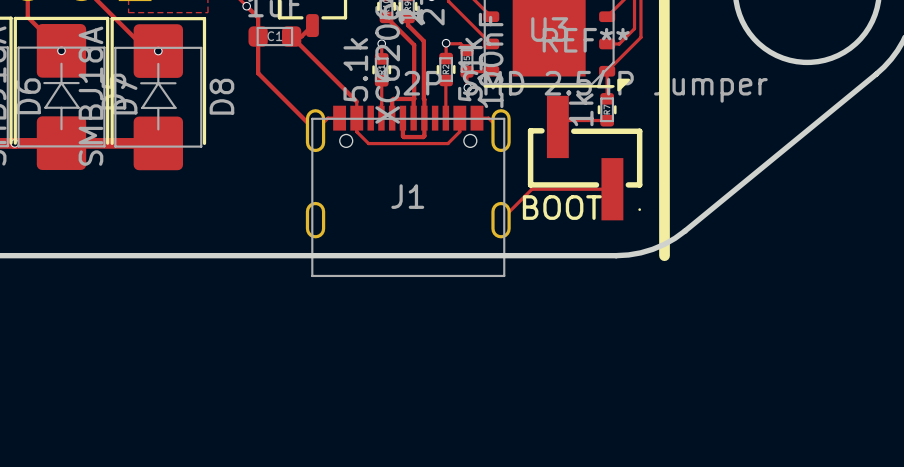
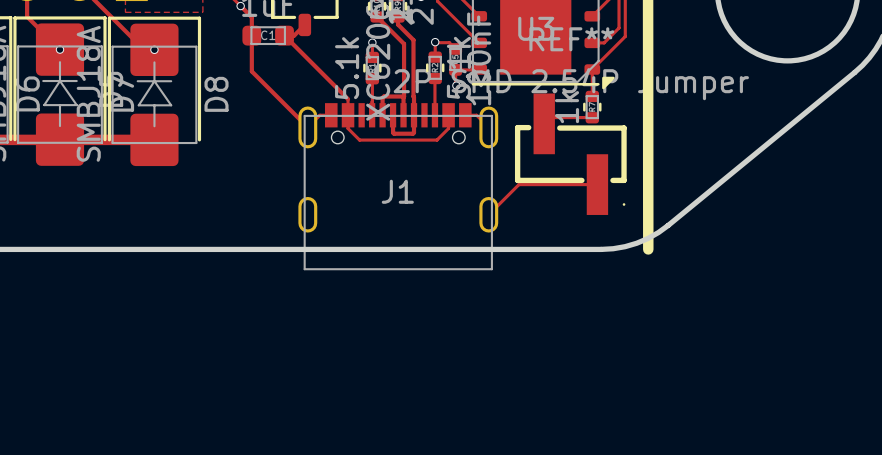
via: (14, 143) -> none
text: BOOT (562, 207) -> none

